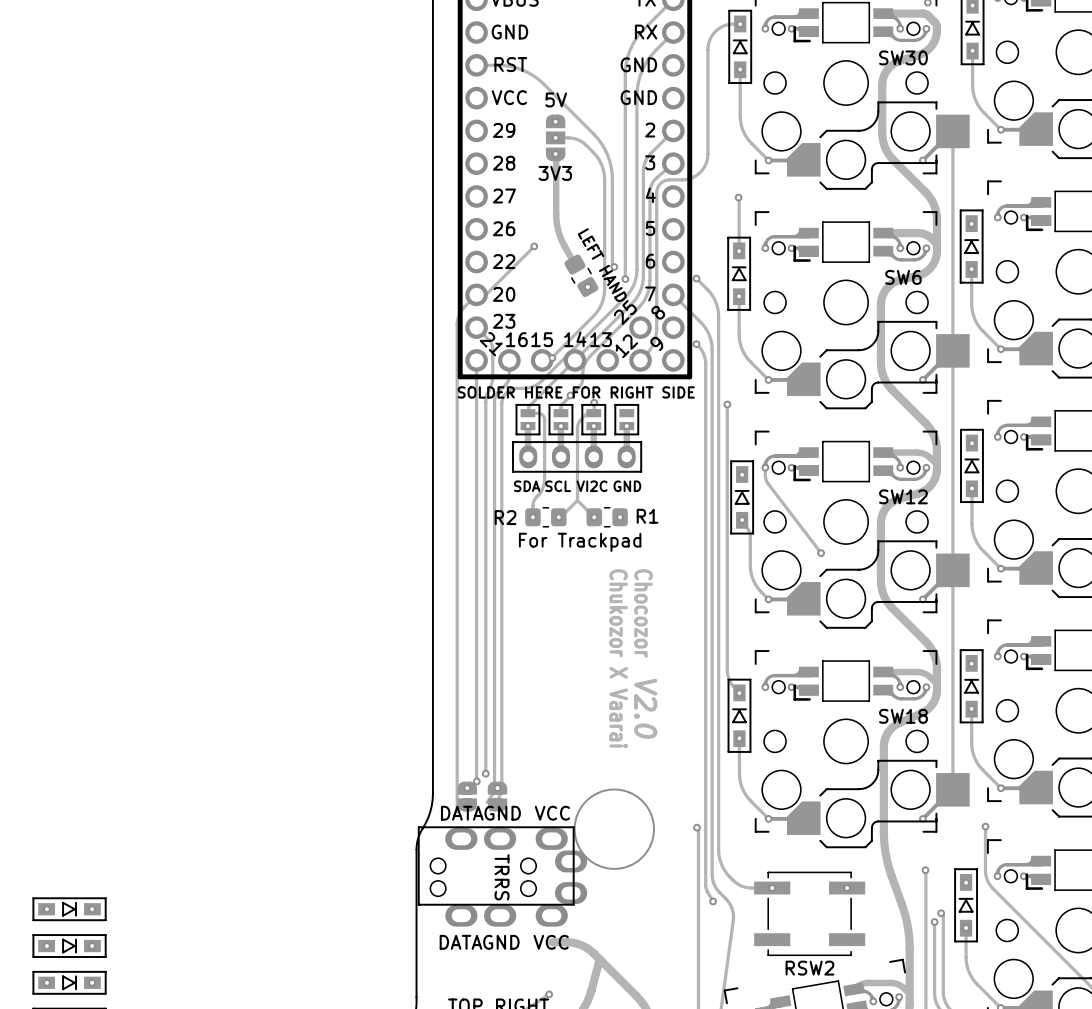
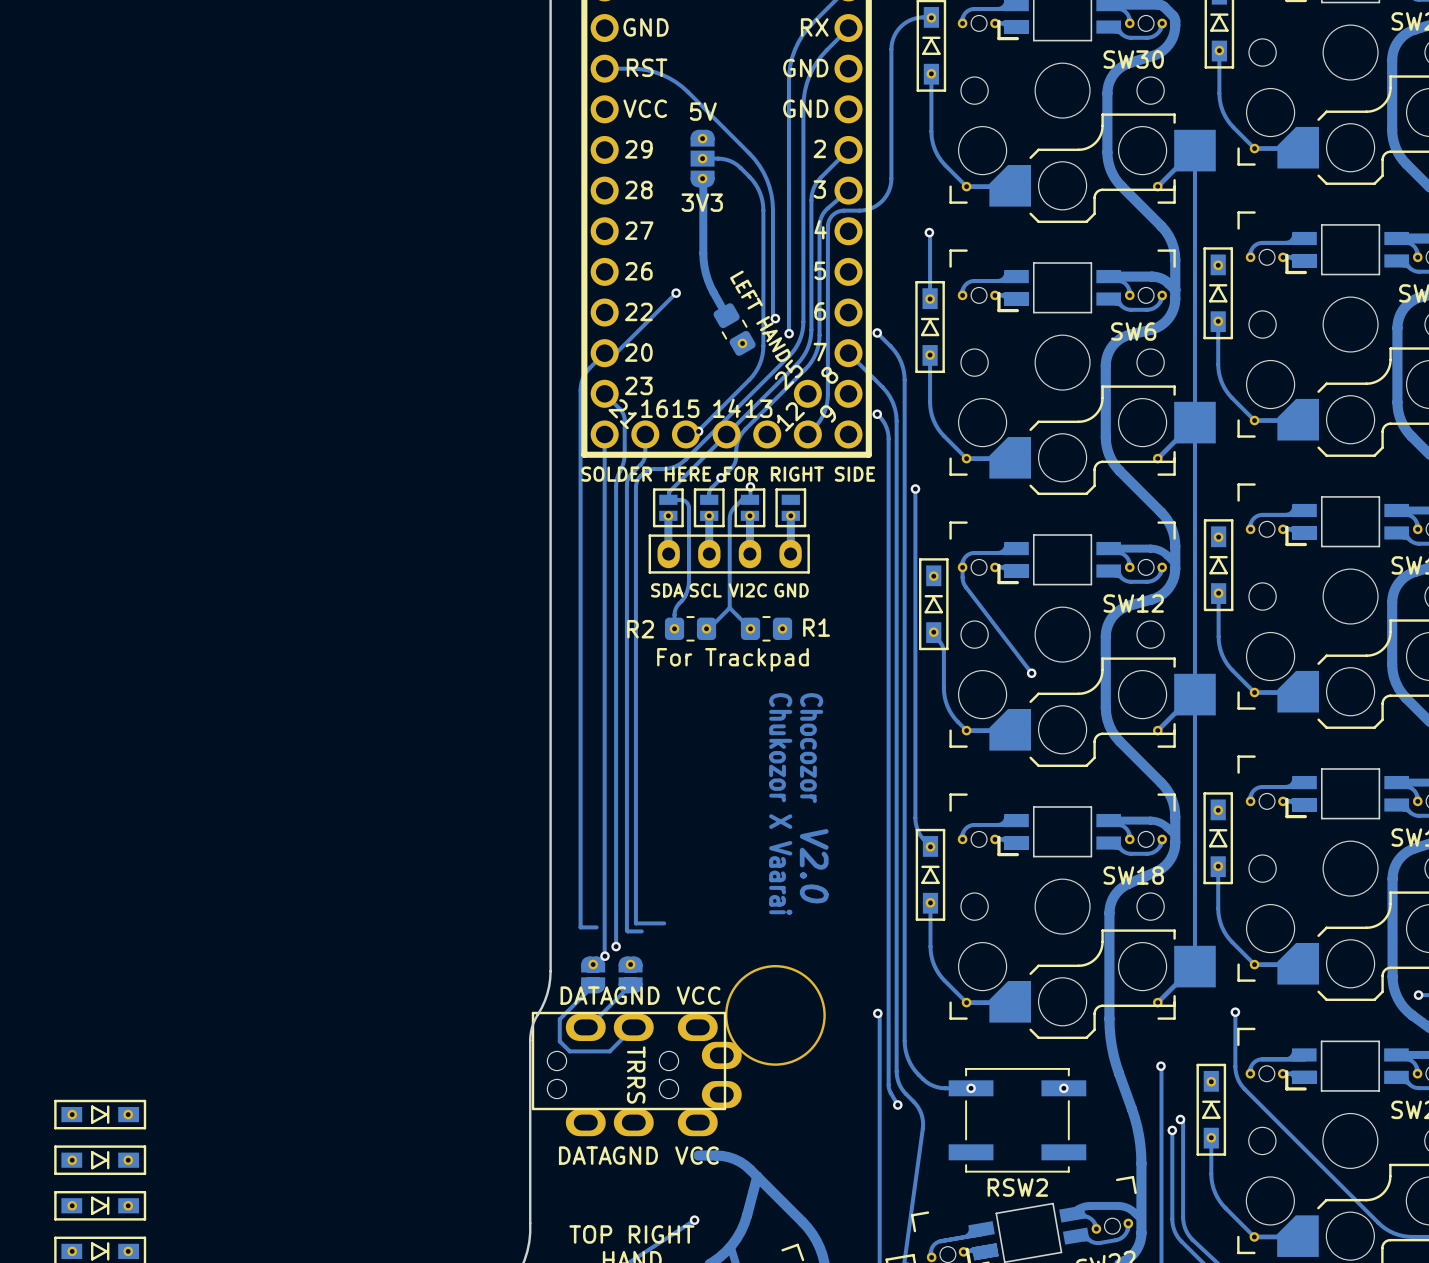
track: (501, 754) (500, 793) (490, 810) -> (635, 923) (664, 923)
track: (457, 758) (457, 811) -> (580, 927) (596, 927)
track: (494, 760) (494, 789) (486, 802) -> (626, 930) (641, 931)
track: none -> (593, 985) (559, 1019) (559, 1041) (569, 1051) (609, 1051) (633, 1027)
track: none -> (630, 985) (588, 1027) (585, 1027)

